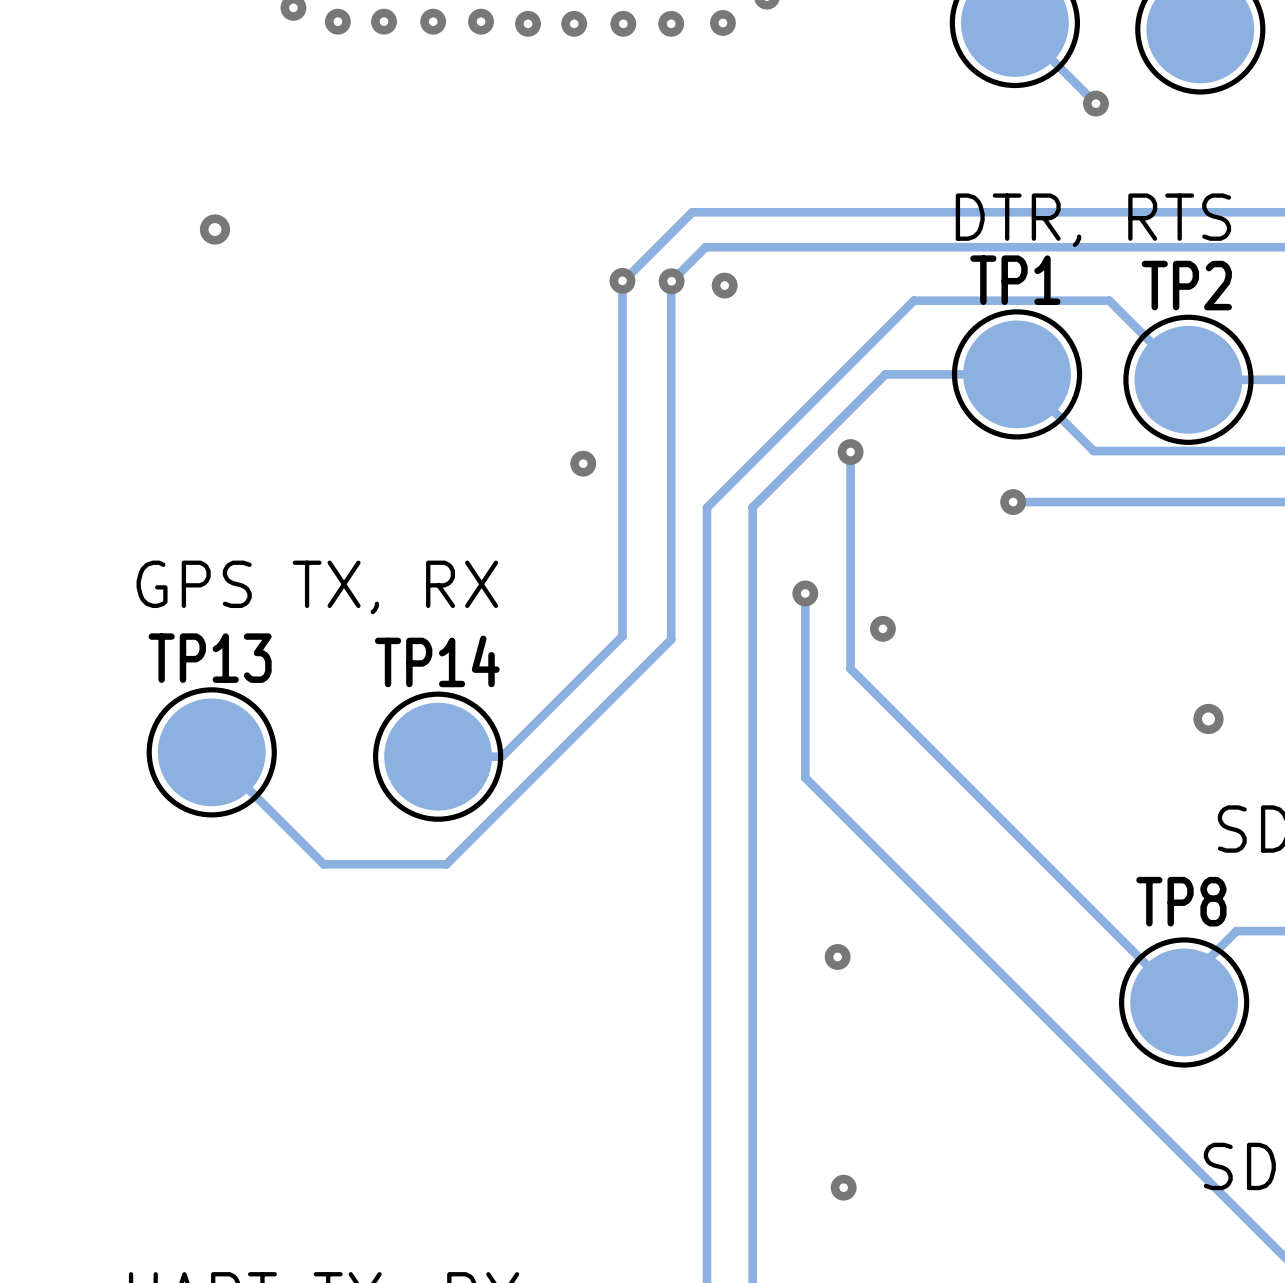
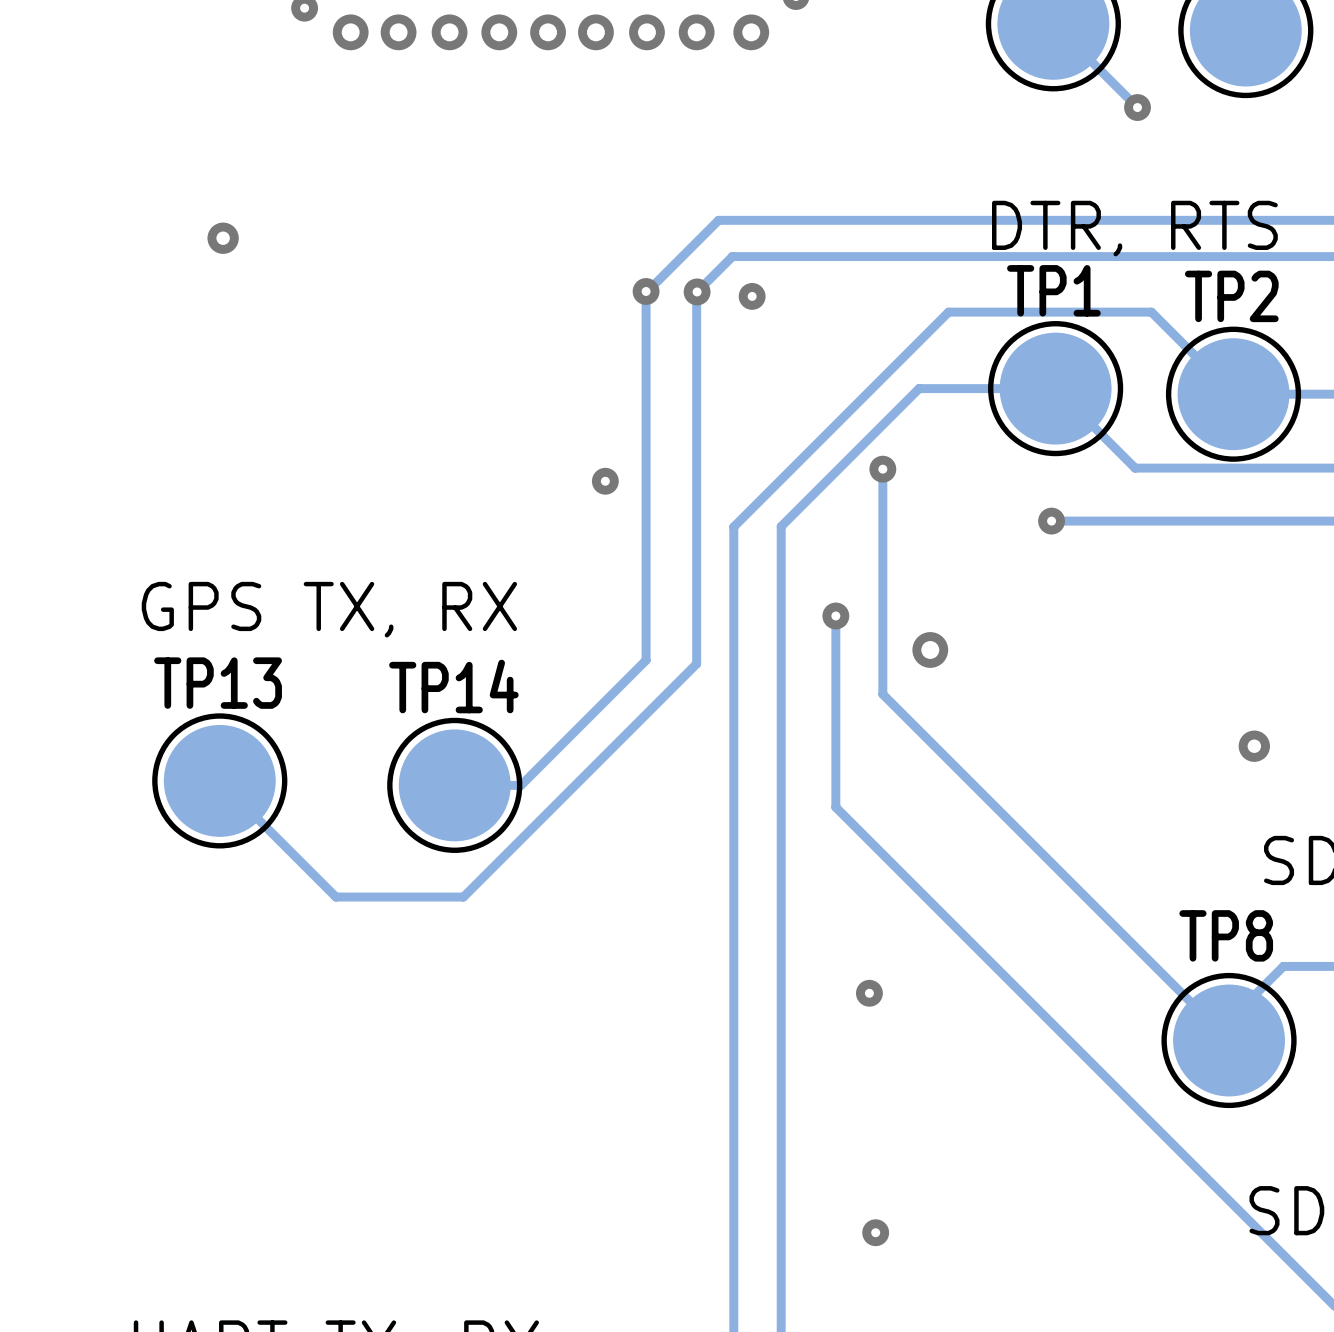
via size: [324, 8, 351, 35] -> [332, 14, 369, 51]
via size: [371, 8, 397, 35] -> [380, 14, 417, 51]
via size: [420, 8, 447, 35] -> [431, 14, 468, 51]
via size: [468, 8, 494, 35] -> [481, 14, 518, 51]
via size: [515, 10, 541, 37] -> [530, 14, 566, 51]
via size: [561, 10, 588, 37] -> [578, 14, 614, 51]
via size: [610, 10, 637, 37] -> [629, 14, 665, 51]
via size: [658, 10, 685, 37] -> [678, 14, 715, 51]
via size: [710, 10, 736, 36] -> [733, 14, 770, 51]
via size: [869, 615, 896, 642] -> [912, 632, 949, 668]

